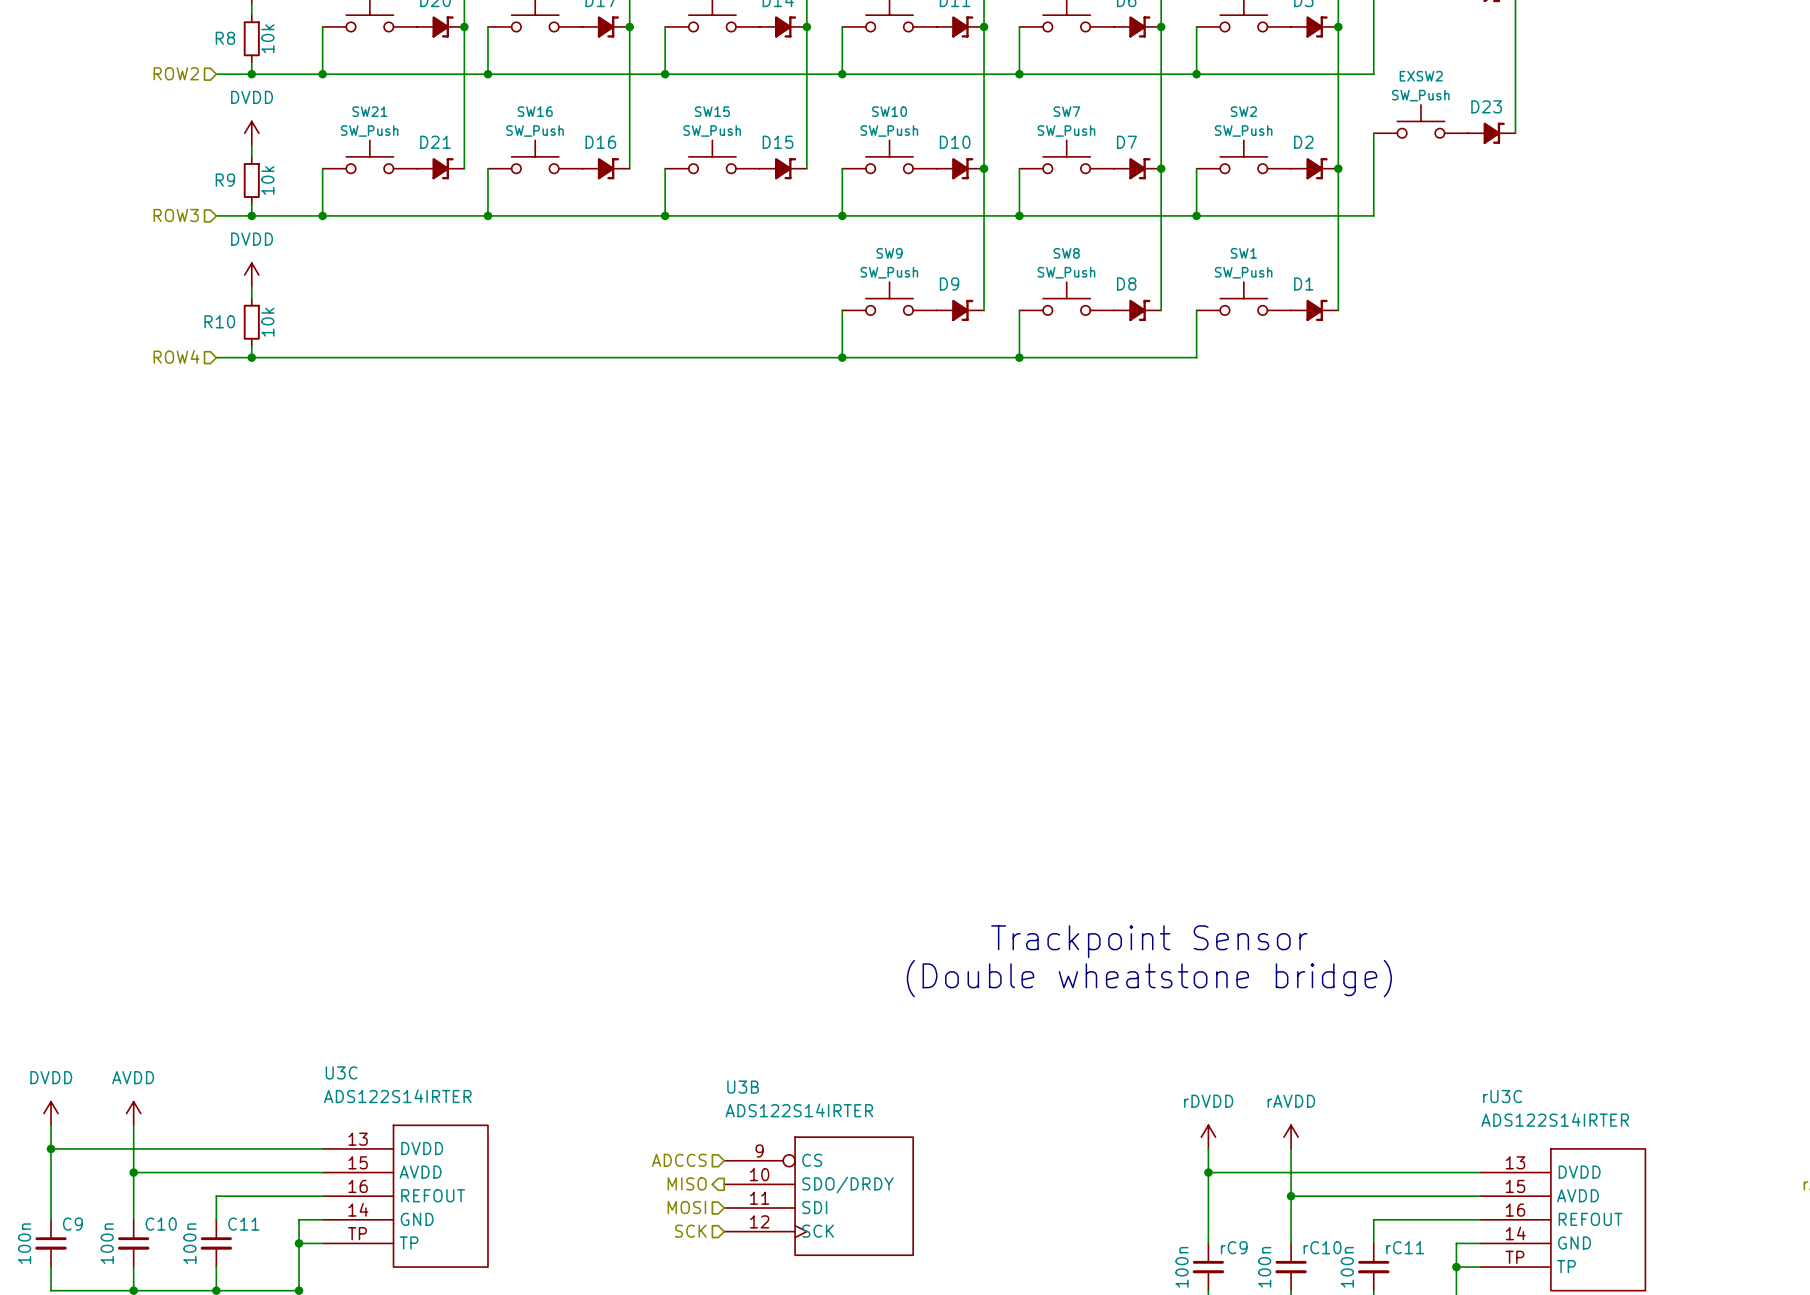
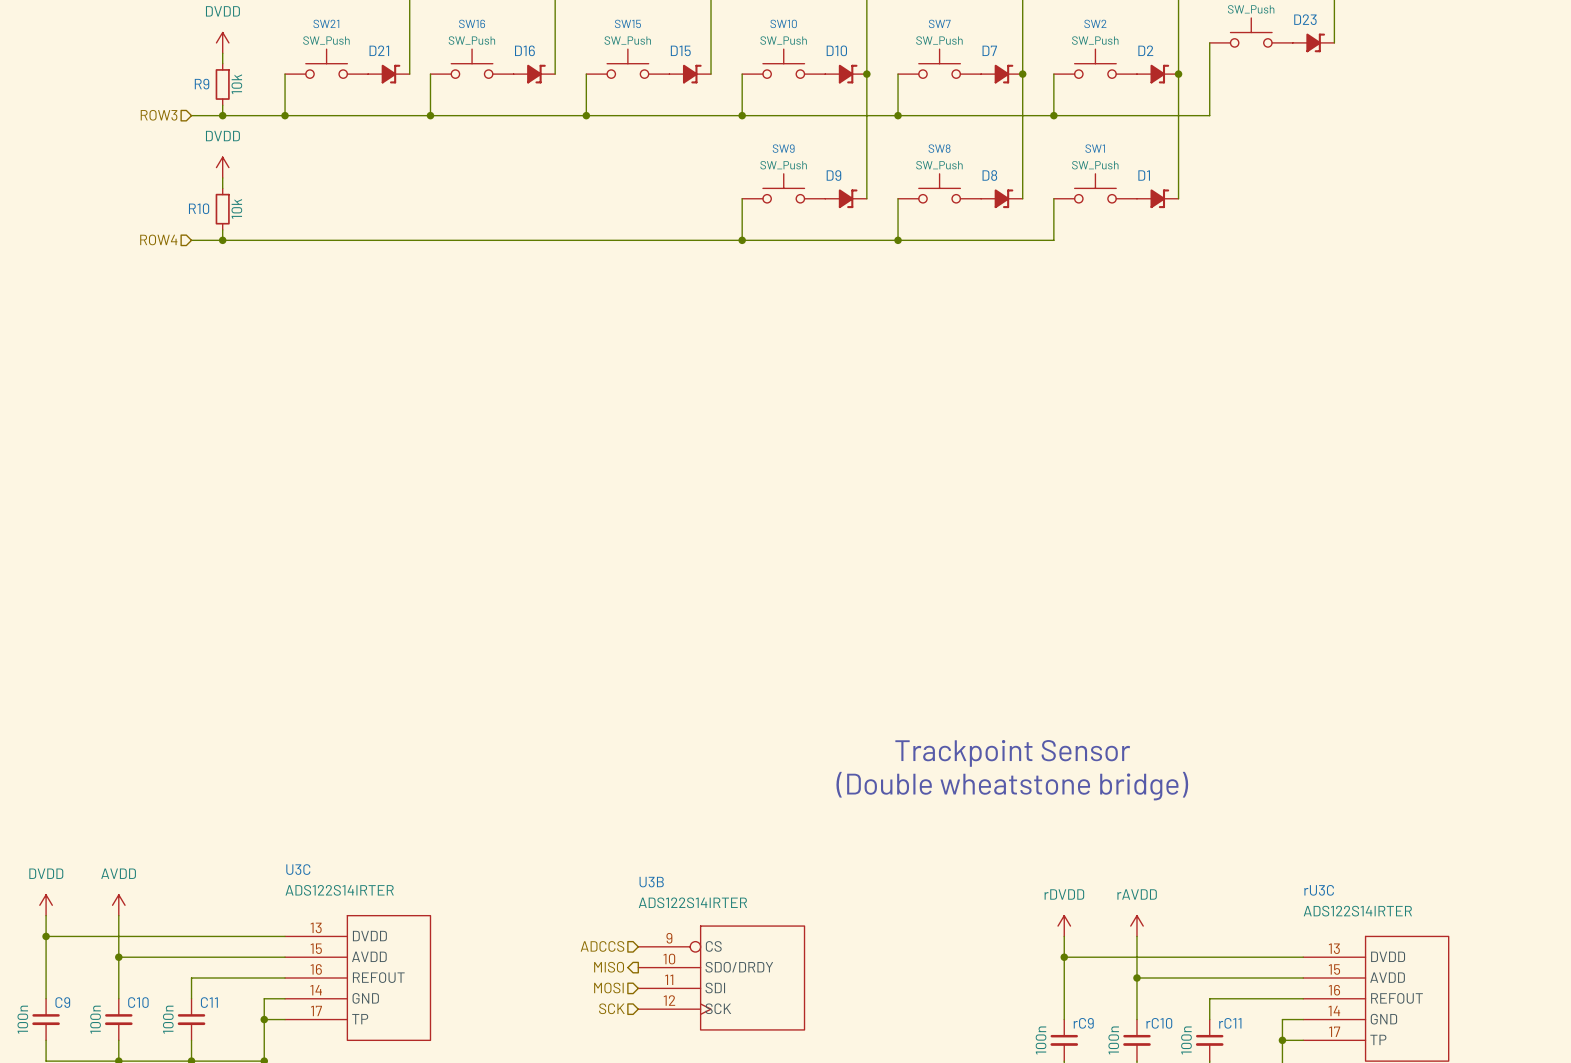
U3C pin number: TP (357, 1233) -> 17 (316, 1010)
rU3C pin number: TP (1514, 1257) -> 17 (1334, 1031)

